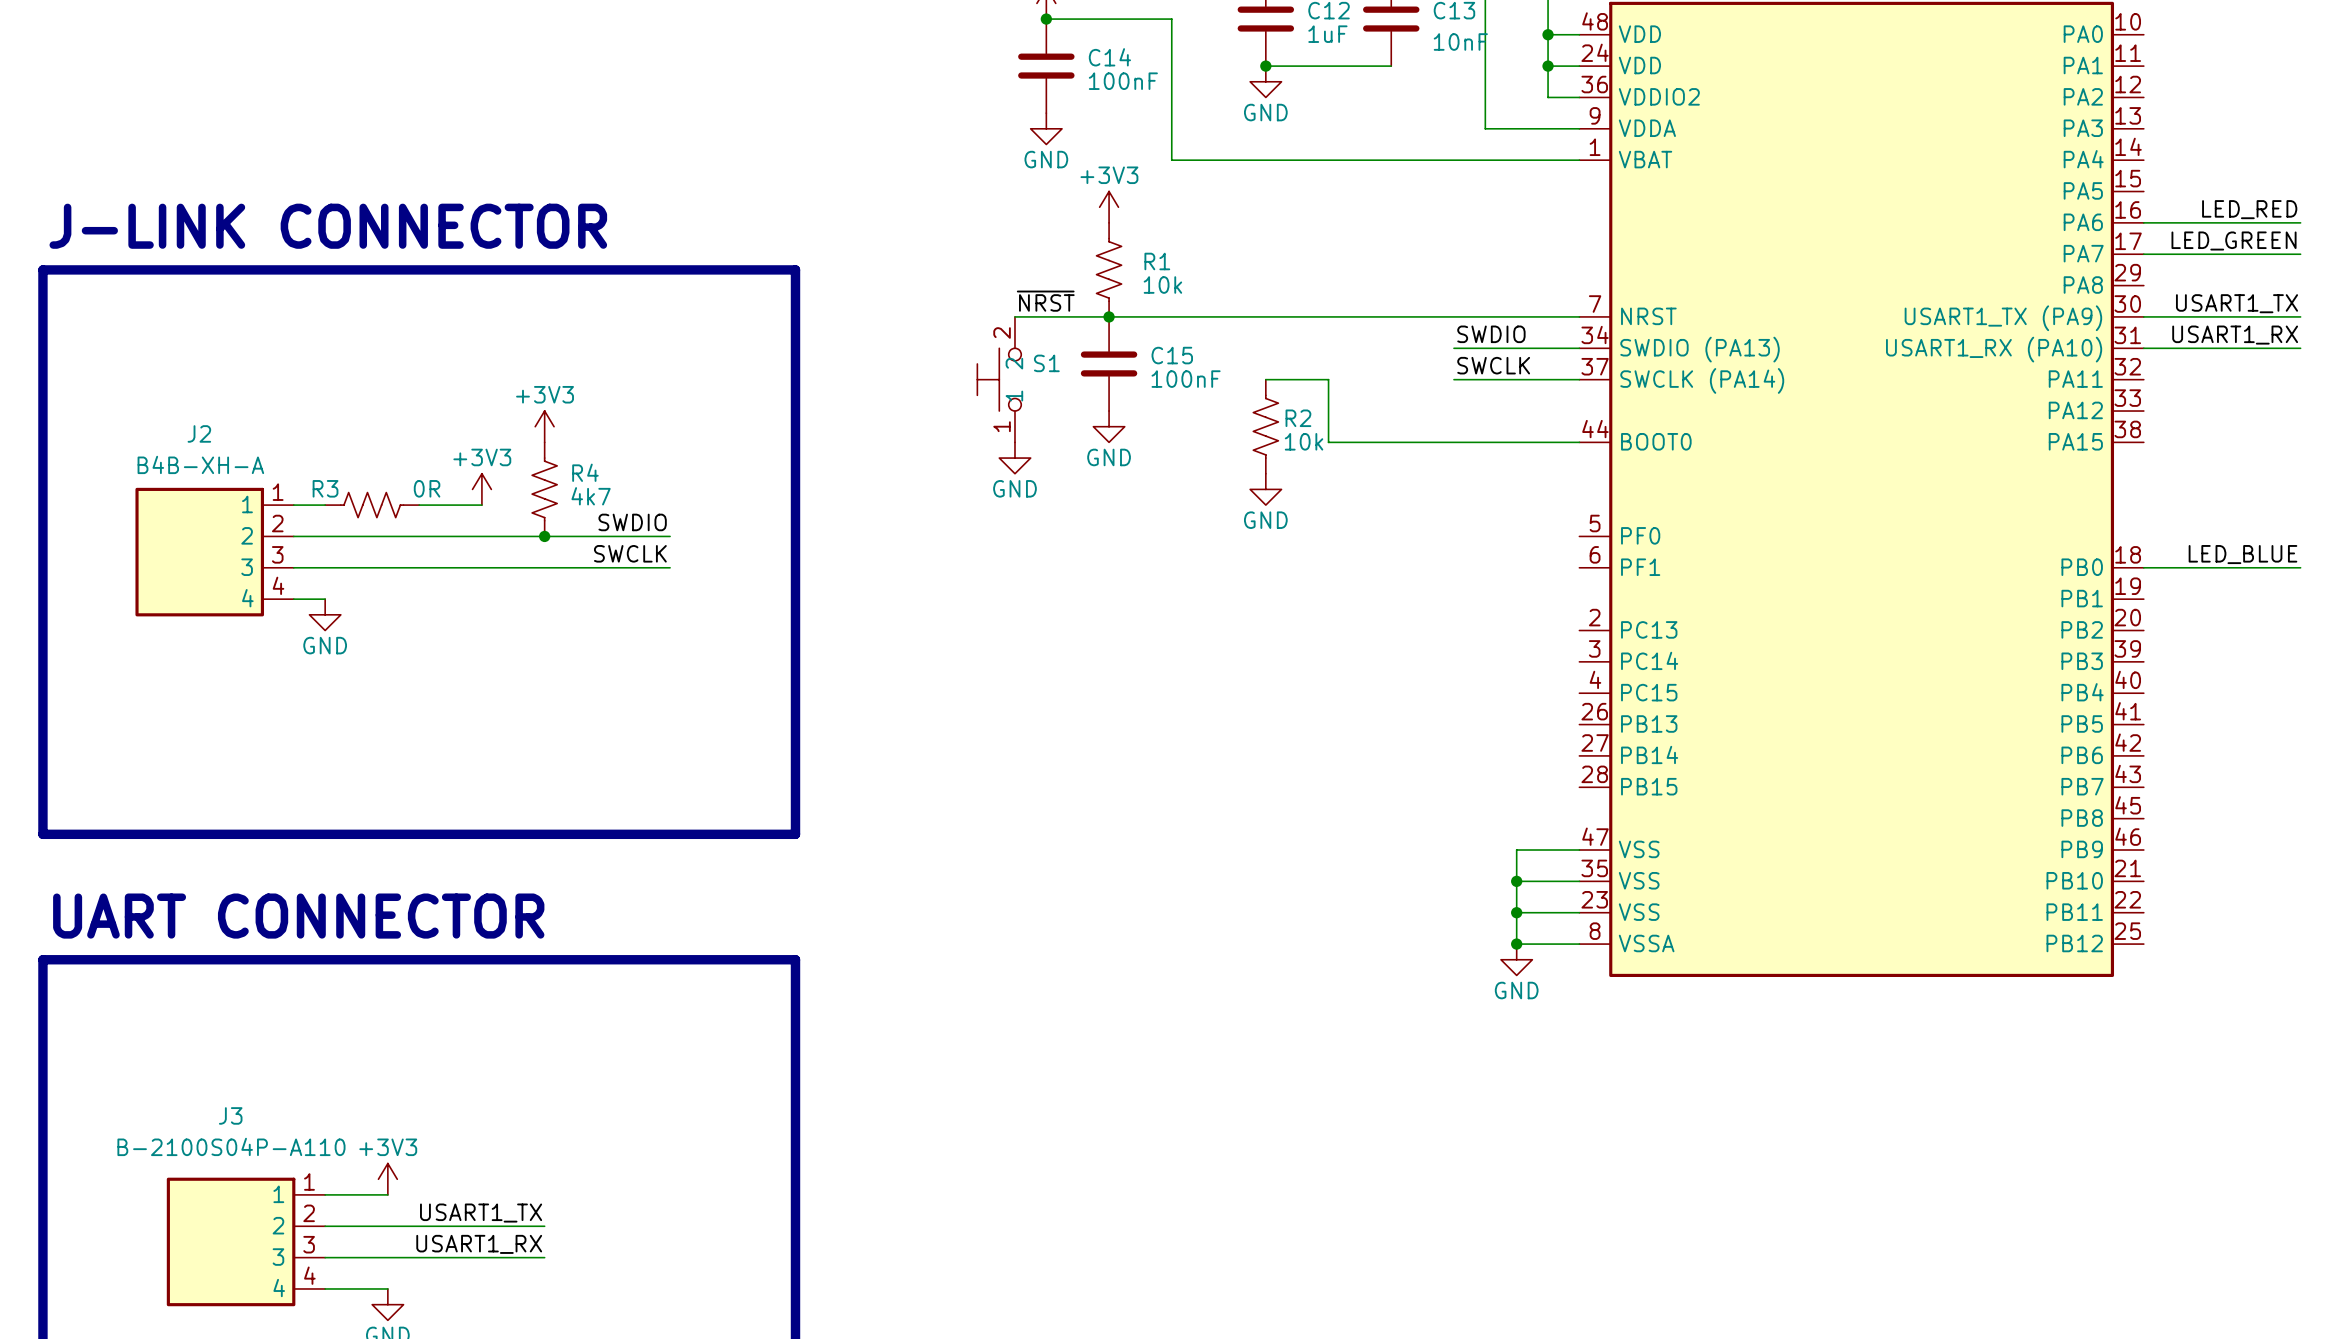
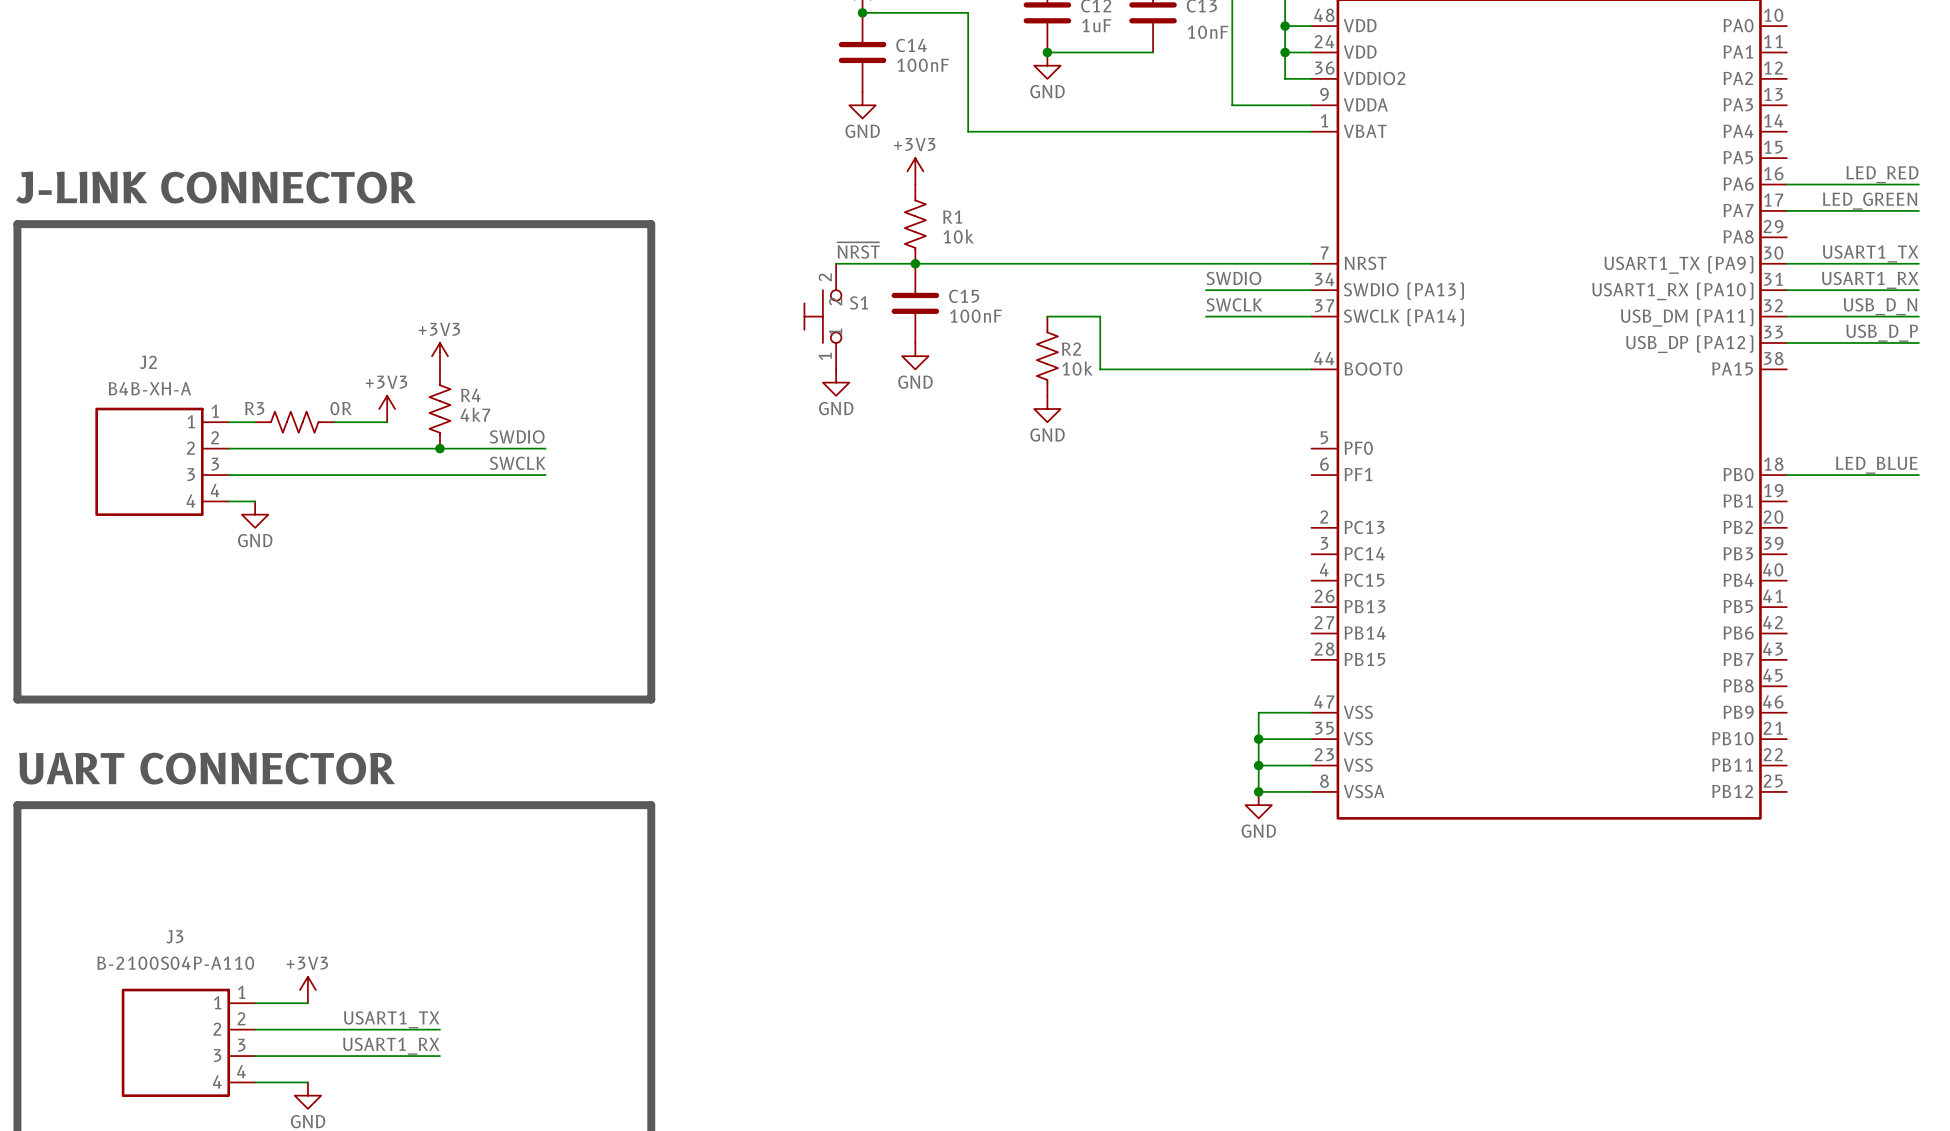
label: none -> USB_D_N (1880, 306)
part pin name: PA11 (2075, 379) -> USB_DM (PA11) (1687, 317)
wire: none -> (1786, 316) (1918, 316)
label: none -> USB_D_P (1882, 333)
part pin name: PA12 (2075, 410) -> USB_DP (PA12) (1689, 344)
wire: none -> (1786, 342) (1918, 342)

